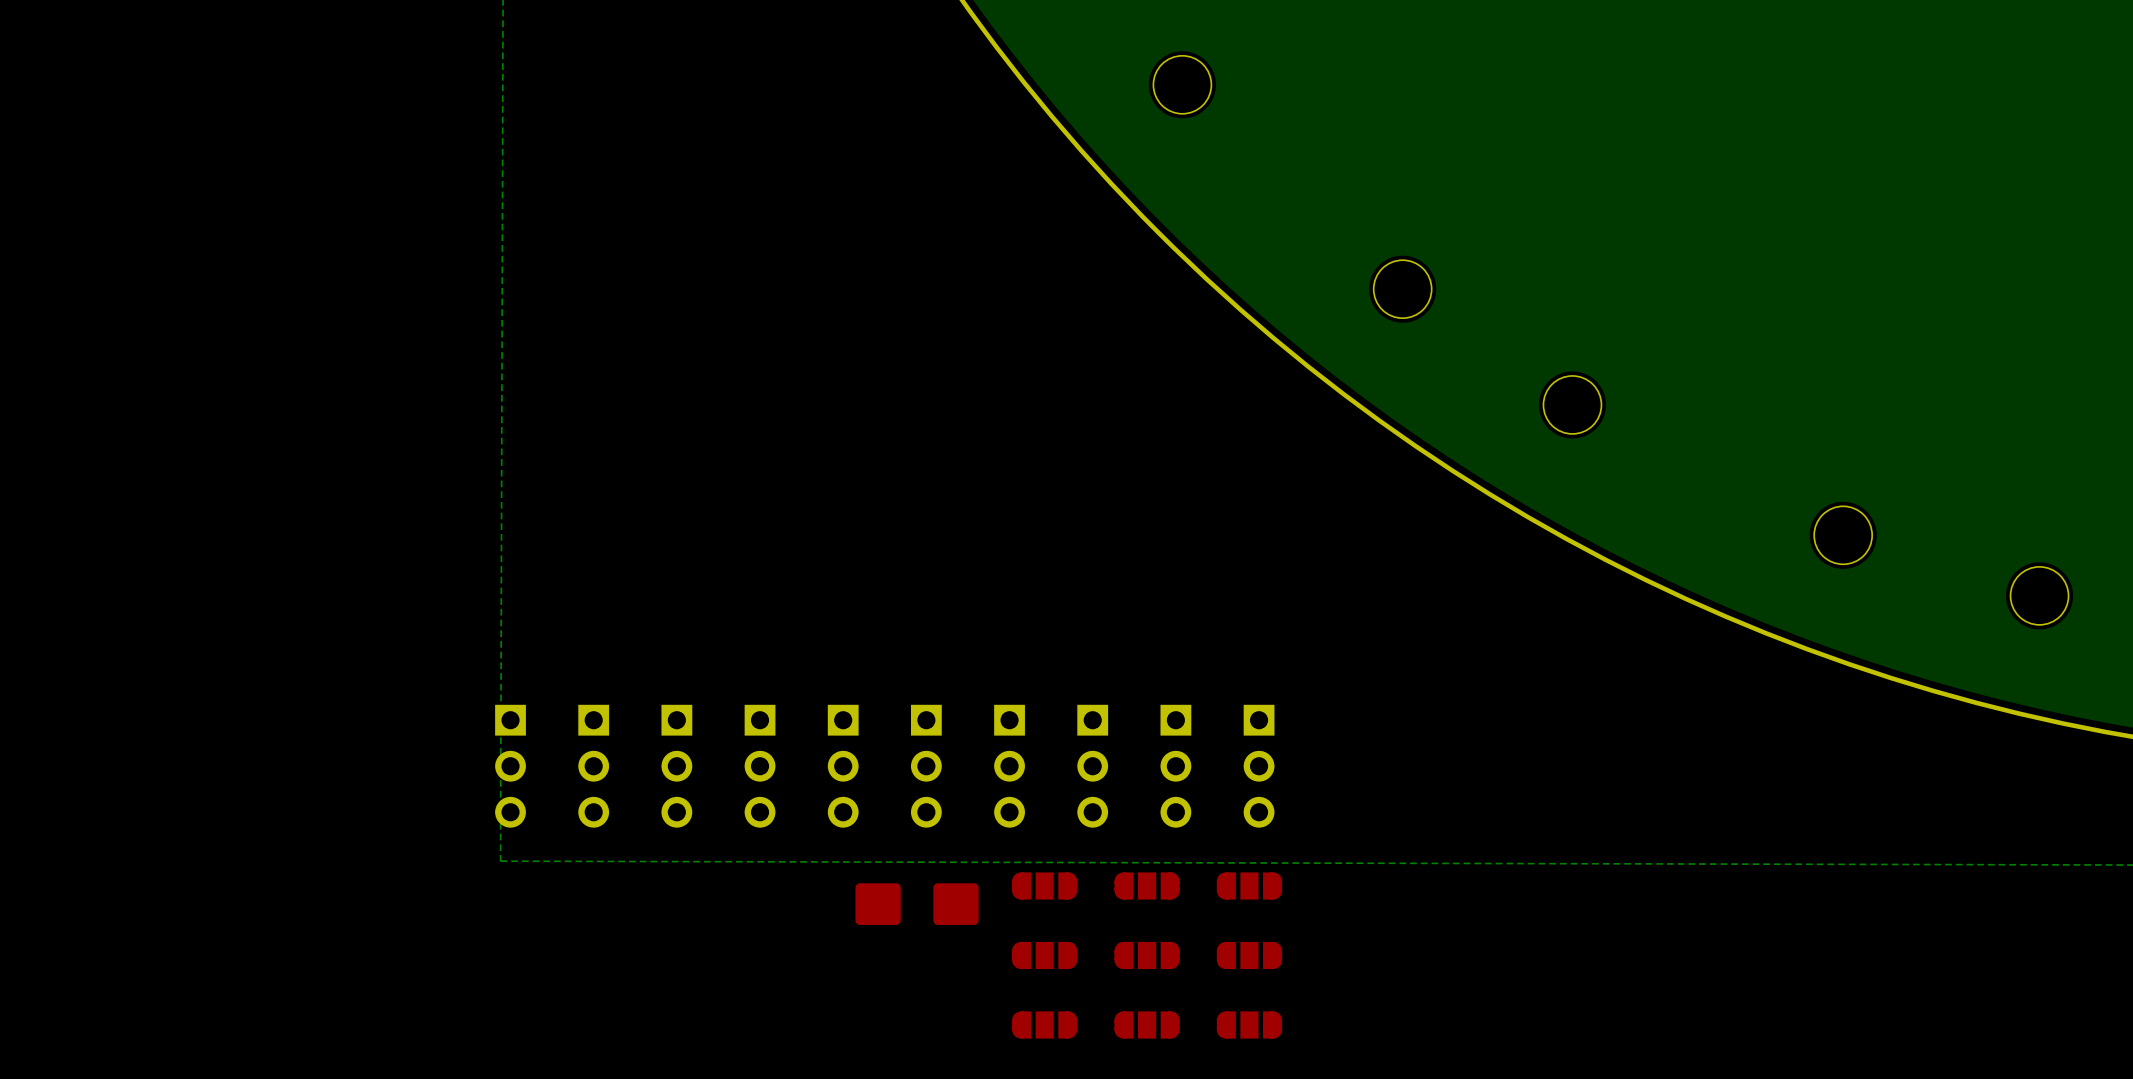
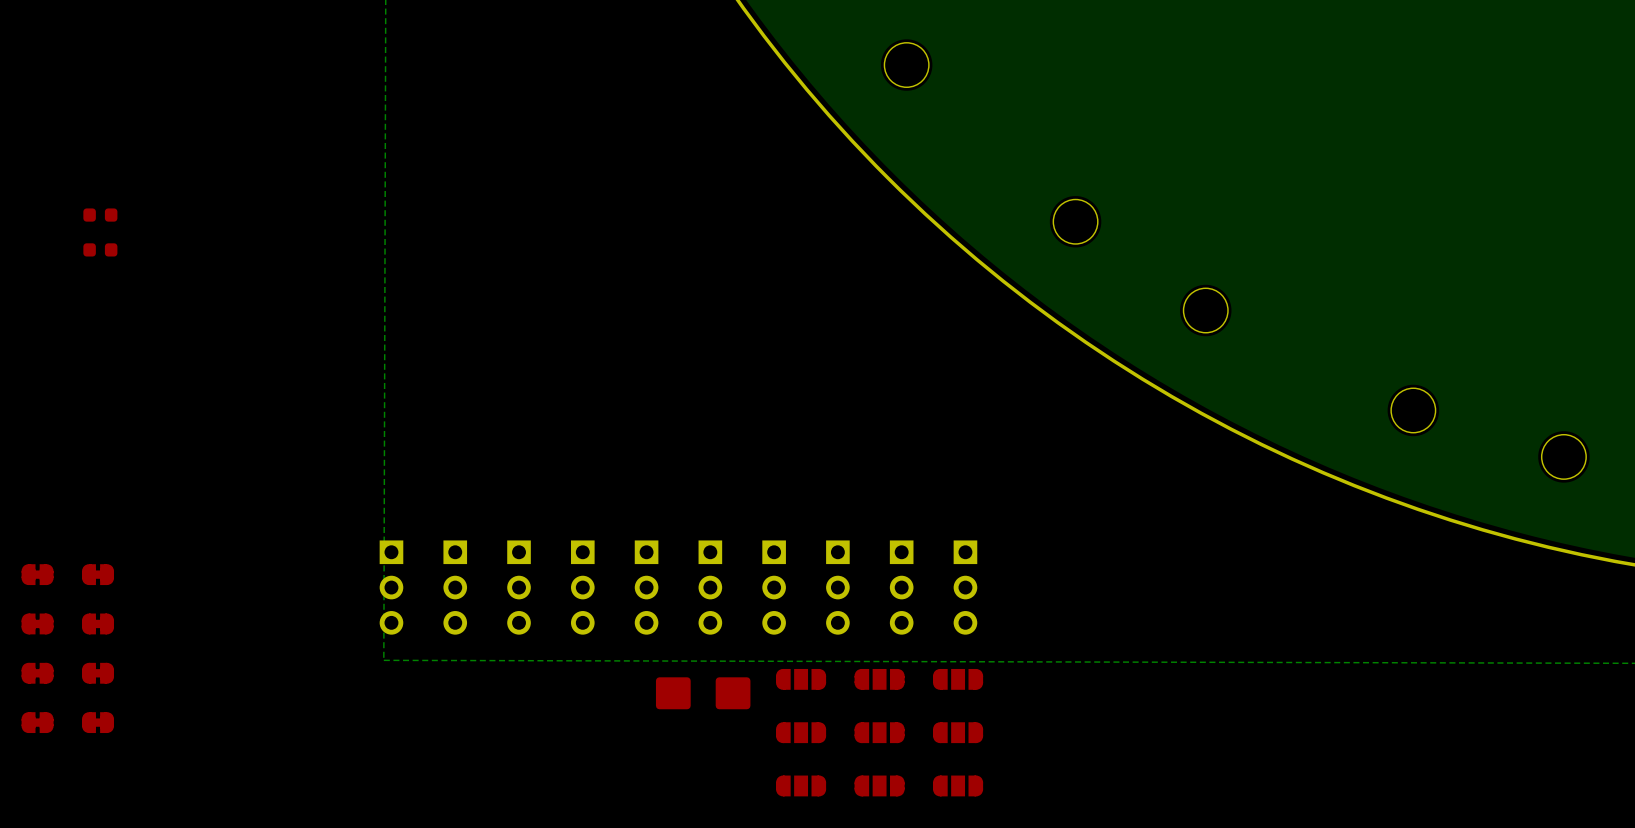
part: none -> (100, 215)
part: none -> (100, 249)
part: none -> (37, 574)
part: none -> (98, 574)
part: none -> (37, 623)
part: none -> (98, 623)
part: none -> (37, 673)
part: none -> (98, 673)
part: none -> (37, 722)
part: none -> (98, 722)

